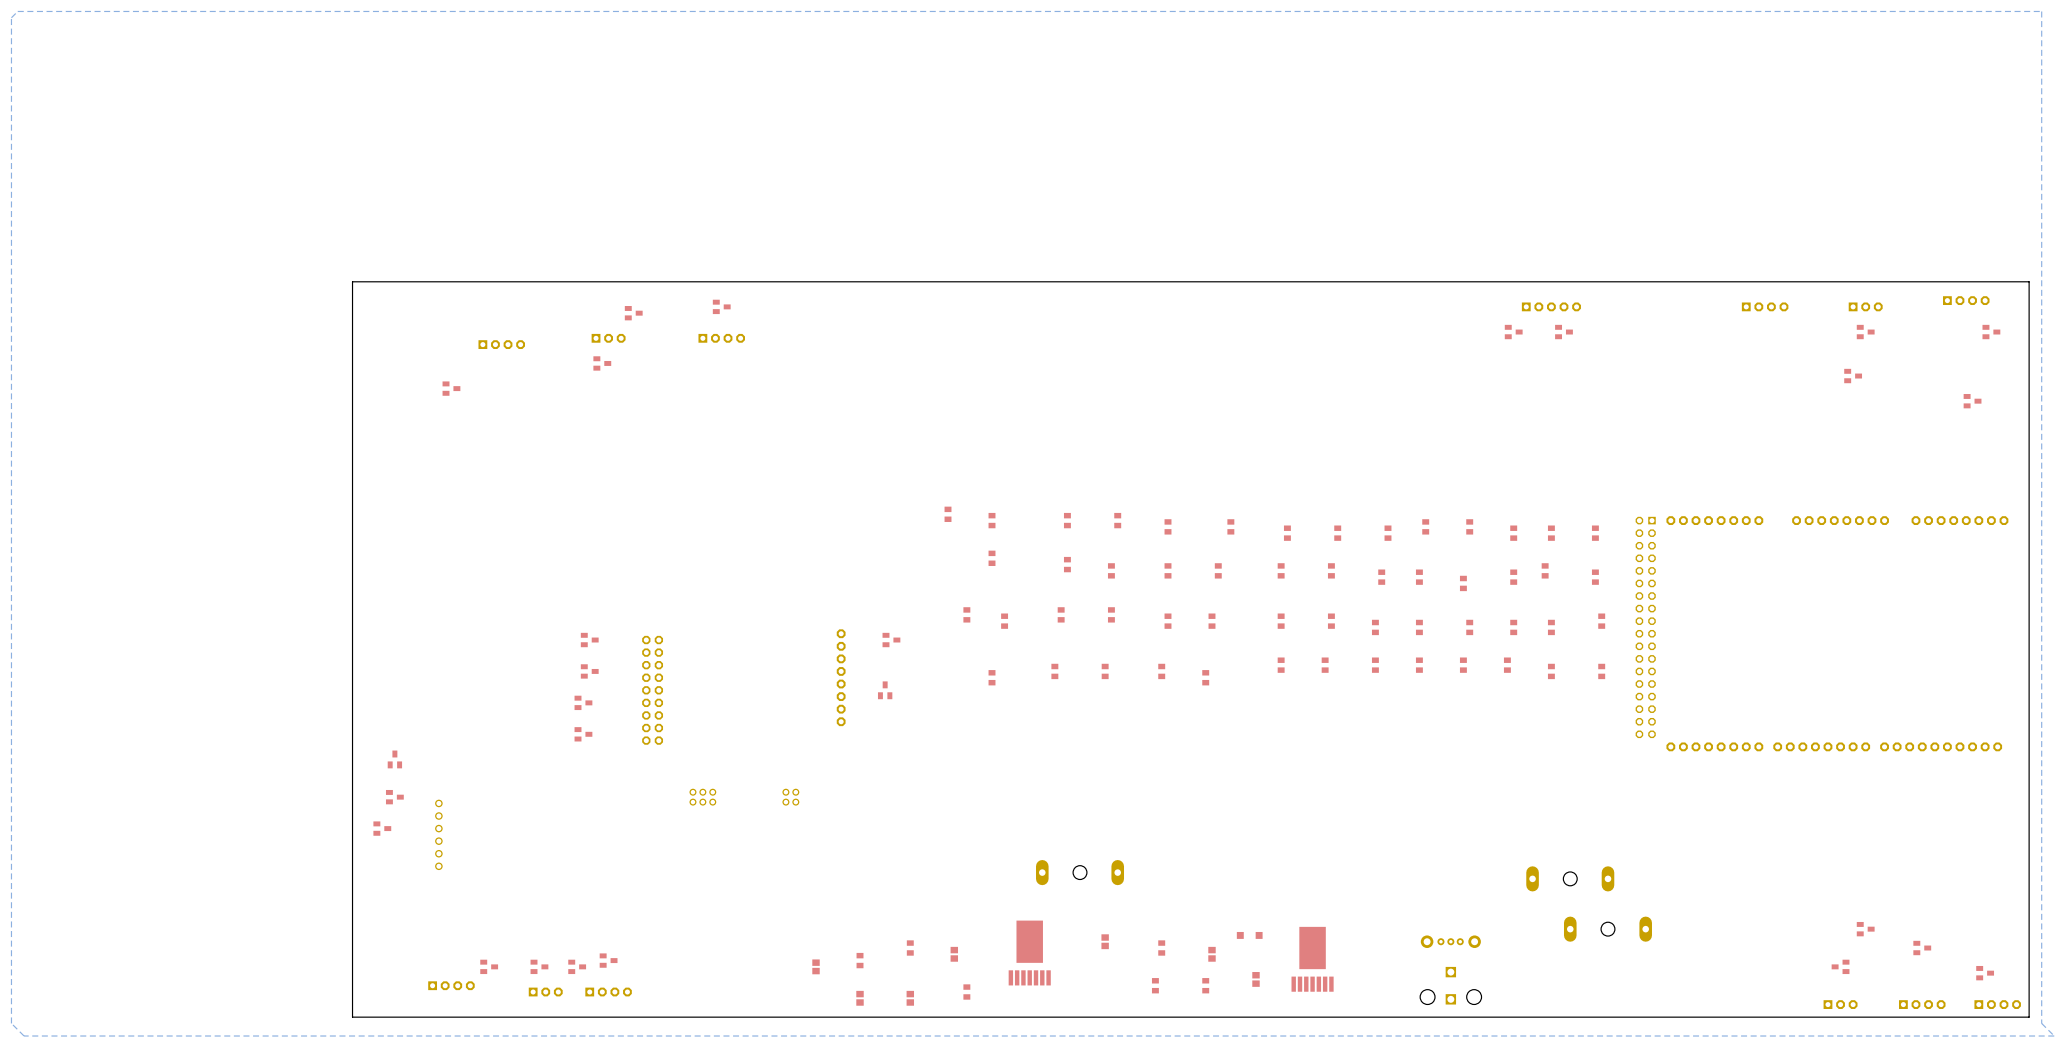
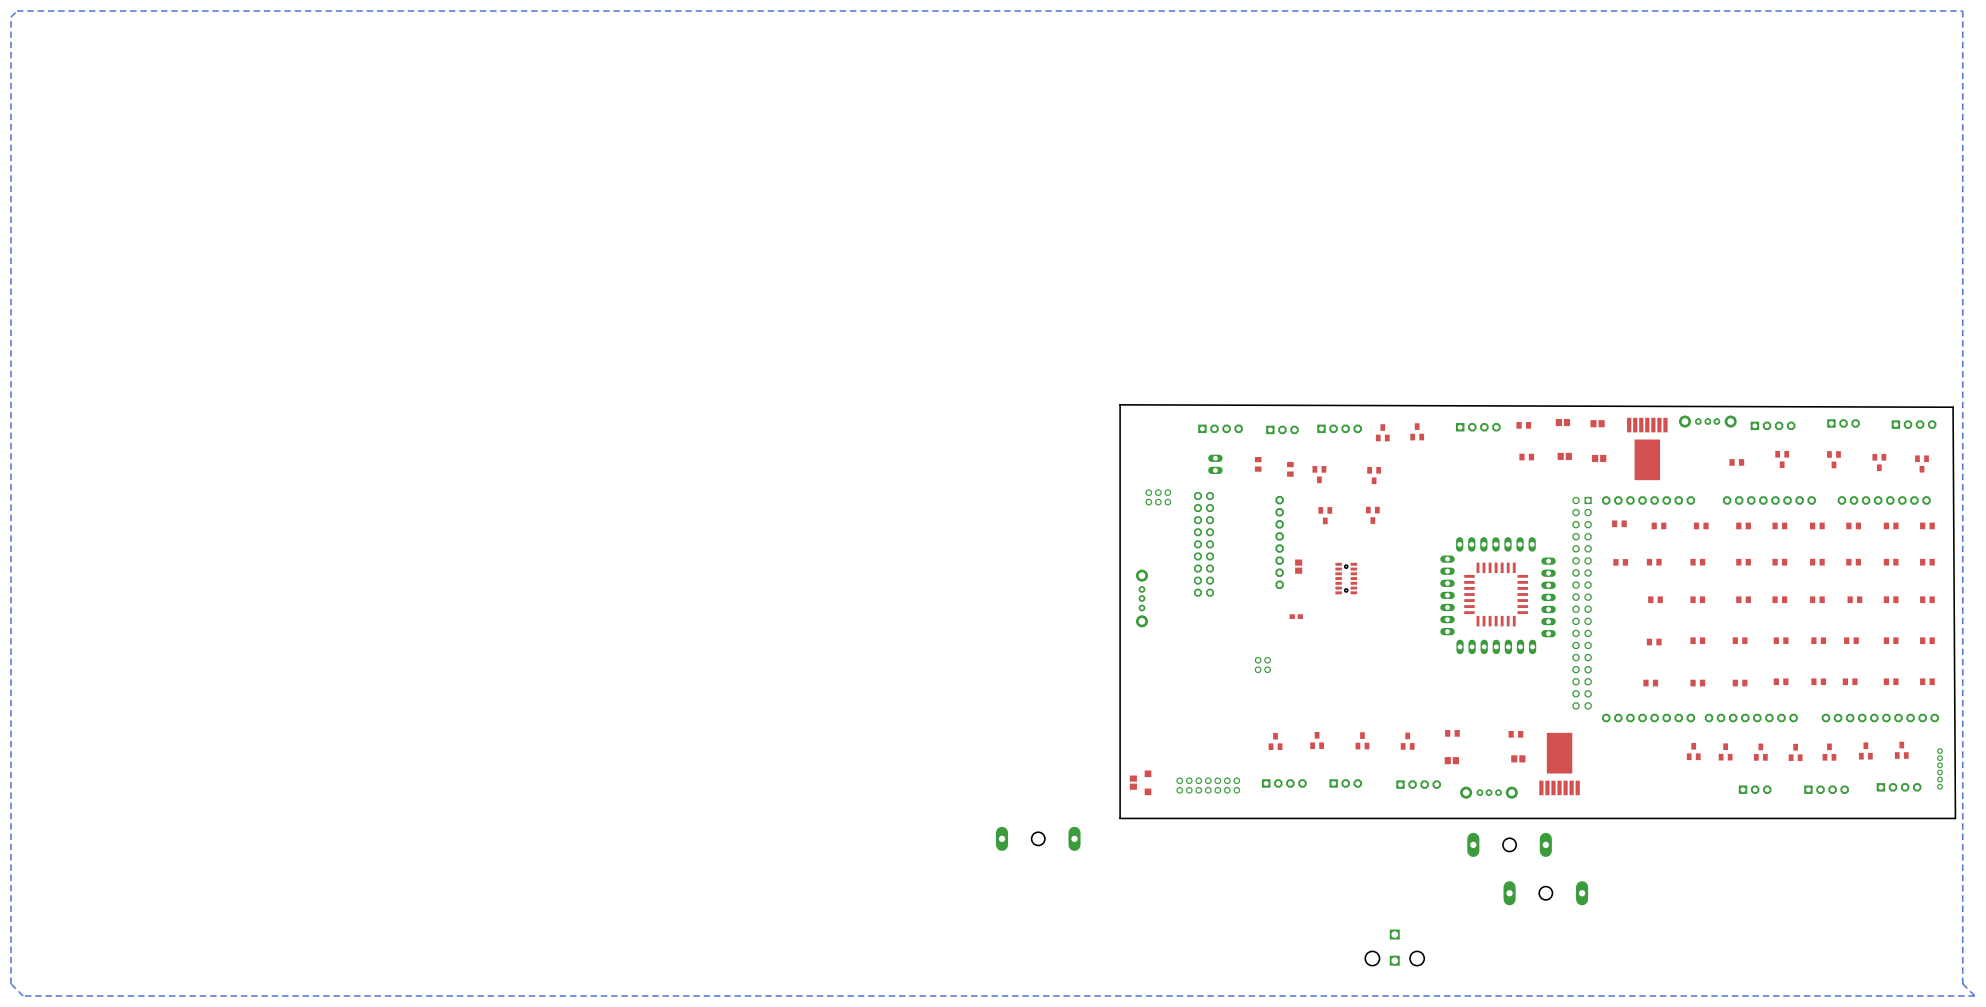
board edge: (2029, 281) (352, 281) (352, 1017) (2029, 1017) (2029, 281) -> none
part: (1966, 300) -> none
part: (721, 306) -> none
part: (1551, 306) -> none
part: (1765, 306) -> none
part: (1865, 306) -> none
part: (633, 313) -> none
part: (1513, 332) -> none
part: (1563, 332) -> none
part: (1865, 332) -> none
part: (1991, 332) -> none
part: (608, 338) -> none
part: (721, 338) -> none
part: (501, 344) -> none
part: (602, 363) -> none
part: (1853, 376) -> none
part: (451, 388) -> none
part: (1972, 401) -> none
board edge: none -> (1120, 404) (1120, 818) (1955, 818) (1953, 407) (1120, 404)
part: none -> (1707, 421)
part: none -> (1562, 422)
part: none -> (1597, 423)
part: none -> (1843, 423)
part: none -> (1914, 424)
part: none -> (1523, 425)
part: none -> (1773, 425)
part: none -> (1478, 427)
part: none -> (1220, 428)
part: none -> (1339, 428)
part: none -> (1282, 429)
part: none -> (1417, 431)
part: none -> (1382, 432)
part: none -> (1647, 448)
part: none -> (1564, 456)
part: none -> (1526, 457)
part: none -> (1599, 458)
part: none -> (1782, 459)
part: none -> (1833, 459)
part: none -> (1736, 462)
part: none -> (1879, 462)
part: none -> (1921, 463)
part: none -> (1215, 464)
part: none -> (1258, 464)
part: none -> (1290, 469)
part: none -> (1319, 474)
part: none -> (1374, 475)
part: (948, 514) -> none
part: none -> (1158, 497)
part: (992, 520) -> none
part: (1067, 520) -> none
part: (1117, 520) -> none
part: (1168, 526) -> none
part: (1230, 526) -> none
part: (1425, 526) -> none
part: (1469, 526) -> none
part: (1287, 533) -> none
part: (1337, 533) -> none
part: (1387, 533) -> none
part: (1513, 533) -> none
part: (1551, 533) -> none
part: (1595, 533) -> none
part: none -> (1325, 515)
part: none -> (1372, 515)
part: none -> (1619, 523)
part: none -> (1658, 525)
part: none -> (1701, 525)
part: none -> (1743, 525)
part: none -> (1779, 525)
part: none -> (1817, 525)
part: none -> (1853, 525)
part: none -> (1891, 525)
part: none -> (1927, 525)
part: (992, 558) -> none
part: (1067, 564) -> none
part: none -> (1279, 542)
part: none -> (1203, 544)
part: none -> (1495, 544)
part: (1111, 570) -> none
part: (1168, 570) -> none
part: (1218, 570) -> none
part: (1281, 570) -> none
part: (1331, 570) -> none
part: (1545, 570) -> none
part: (1381, 577) -> none
part: (1419, 577) -> none
part: (1513, 577) -> none
part: (1595, 577) -> none
part: (1463, 583) -> none
part: none -> (1620, 562)
part: none -> (1654, 562)
part: none -> (1697, 562)
part: none -> (1743, 562)
part: none -> (1779, 562)
part: none -> (1817, 562)
part: none -> (1853, 562)
part: none -> (1891, 562)
part: none -> (1927, 562)
part: none -> (1298, 566)
part: none -> (1346, 578)
part: (966, 614) -> none
part: (1061, 614) -> none
part: (1111, 614) -> none
part: none -> (1496, 594)
part: none -> (1447, 595)
part: (1004, 621) -> none
part: (1168, 621) -> none
part: (1212, 621) -> none
part: (1281, 621) -> none
part: (1331, 621) -> none
part: (1601, 621) -> none
part: none -> (1548, 597)
part: none -> (1141, 598)
part: none -> (1655, 599)
part: none -> (1697, 599)
part: none -> (1743, 599)
part: none -> (1779, 599)
part: none -> (1817, 599)
part: none -> (1854, 599)
part: none -> (1891, 599)
part: none -> (1927, 599)
part: (1375, 627) -> none
part: (1419, 627) -> none
part: (1469, 627) -> none
part: (1513, 627) -> none
part: (1551, 627) -> none
part: (589, 640) -> none
part: (891, 640) -> none
part: none -> (1296, 616)
part: (1281, 665) -> none
part: (1325, 665) -> none
part: (1375, 665) -> none
part: (1419, 665) -> none
part: (1463, 665) -> none
part: (1507, 665) -> none
part: none -> (1697, 640)
part: none -> (1740, 640)
part: none -> (1781, 640)
part: none -> (1818, 640)
part: none -> (1851, 640)
part: none -> (1891, 640)
part: none -> (1927, 640)
part: none -> (1654, 642)
part: (589, 671) -> none
part: (1054, 671) -> none
part: (1105, 671) -> none
part: (1161, 671) -> none
part: (1551, 671) -> none
part: (1601, 671) -> none
part: none -> (1496, 646)
part: (841, 677) -> none
part: (992, 677) -> none
part: (1205, 677) -> none
part: (652, 690) -> none
part: (885, 690) -> none
part: none -> (1262, 665)
part: (583, 702) -> none
part: none -> (1781, 681)
part: none -> (1818, 681)
part: none -> (1850, 681)
part: none -> (1891, 681)
part: none -> (1927, 681)
part: none -> (1650, 683)
part: none -> (1697, 683)
part: none -> (1740, 683)
part: (583, 734) -> none
part position: (1941, 746) -> (1880, 718)
part: (394, 759) -> none
part: none -> (1452, 733)
part: none -> (1515, 734)
part: none -> (1317, 740)
part: none -> (1362, 740)
part: none -> (1407, 741)
part: none -> (1275, 741)
part: none -> (1901, 750)
part: none -> (1693, 751)
part: none -> (1865, 750)
part: none -> (1725, 751)
part: none -> (1760, 752)
part: none -> (1795, 752)
part: none -> (1829, 752)
part: none -> (1518, 758)
part: none -> (1451, 760)
part: none -> (1559, 764)
part: (394, 797) -> none
part: (702, 797) -> none
part: (790, 797) -> none
part: none -> (1940, 768)
part: none -> (1133, 782)
part: none -> (1147, 782)
part: none -> (1284, 783)
part: none -> (1345, 783)
part: none -> (1418, 784)
part: none -> (1208, 785)
part: none -> (1899, 787)
part: none -> (1755, 789)
part: none -> (1826, 789)
part: none -> (1488, 792)
part: (382, 828) -> none
part: (438, 834) -> none
part: (1865, 929) -> none
part: (1249, 935) -> none
part: (1105, 941) -> none
part: (1450, 941) -> none
part: (910, 948) -> none
part: (1161, 948) -> none
part: (1922, 948) -> none
part: (1029, 953) -> none
part: (954, 954) -> none
part: (1212, 954) -> none
part: (1312, 959) -> none
part: (608, 960) -> none
part: (860, 960) -> none
part: (489, 966) -> none
part: (539, 966) -> none
part: (577, 966) -> none
part: (816, 966) -> none
part: (1840, 966) -> none
part: (1985, 973) -> none
part: (1256, 979) -> none
part: (451, 985) -> none
part: (1155, 985) -> none
part: (1205, 985) -> none
part: (545, 992) -> none
part: (608, 992) -> none
part: (966, 992) -> none
part: (860, 998) -> none
part: (910, 998) -> none
part: (1840, 1004) -> none
part: (1922, 1004) -> none
part: (1997, 1004) -> none

